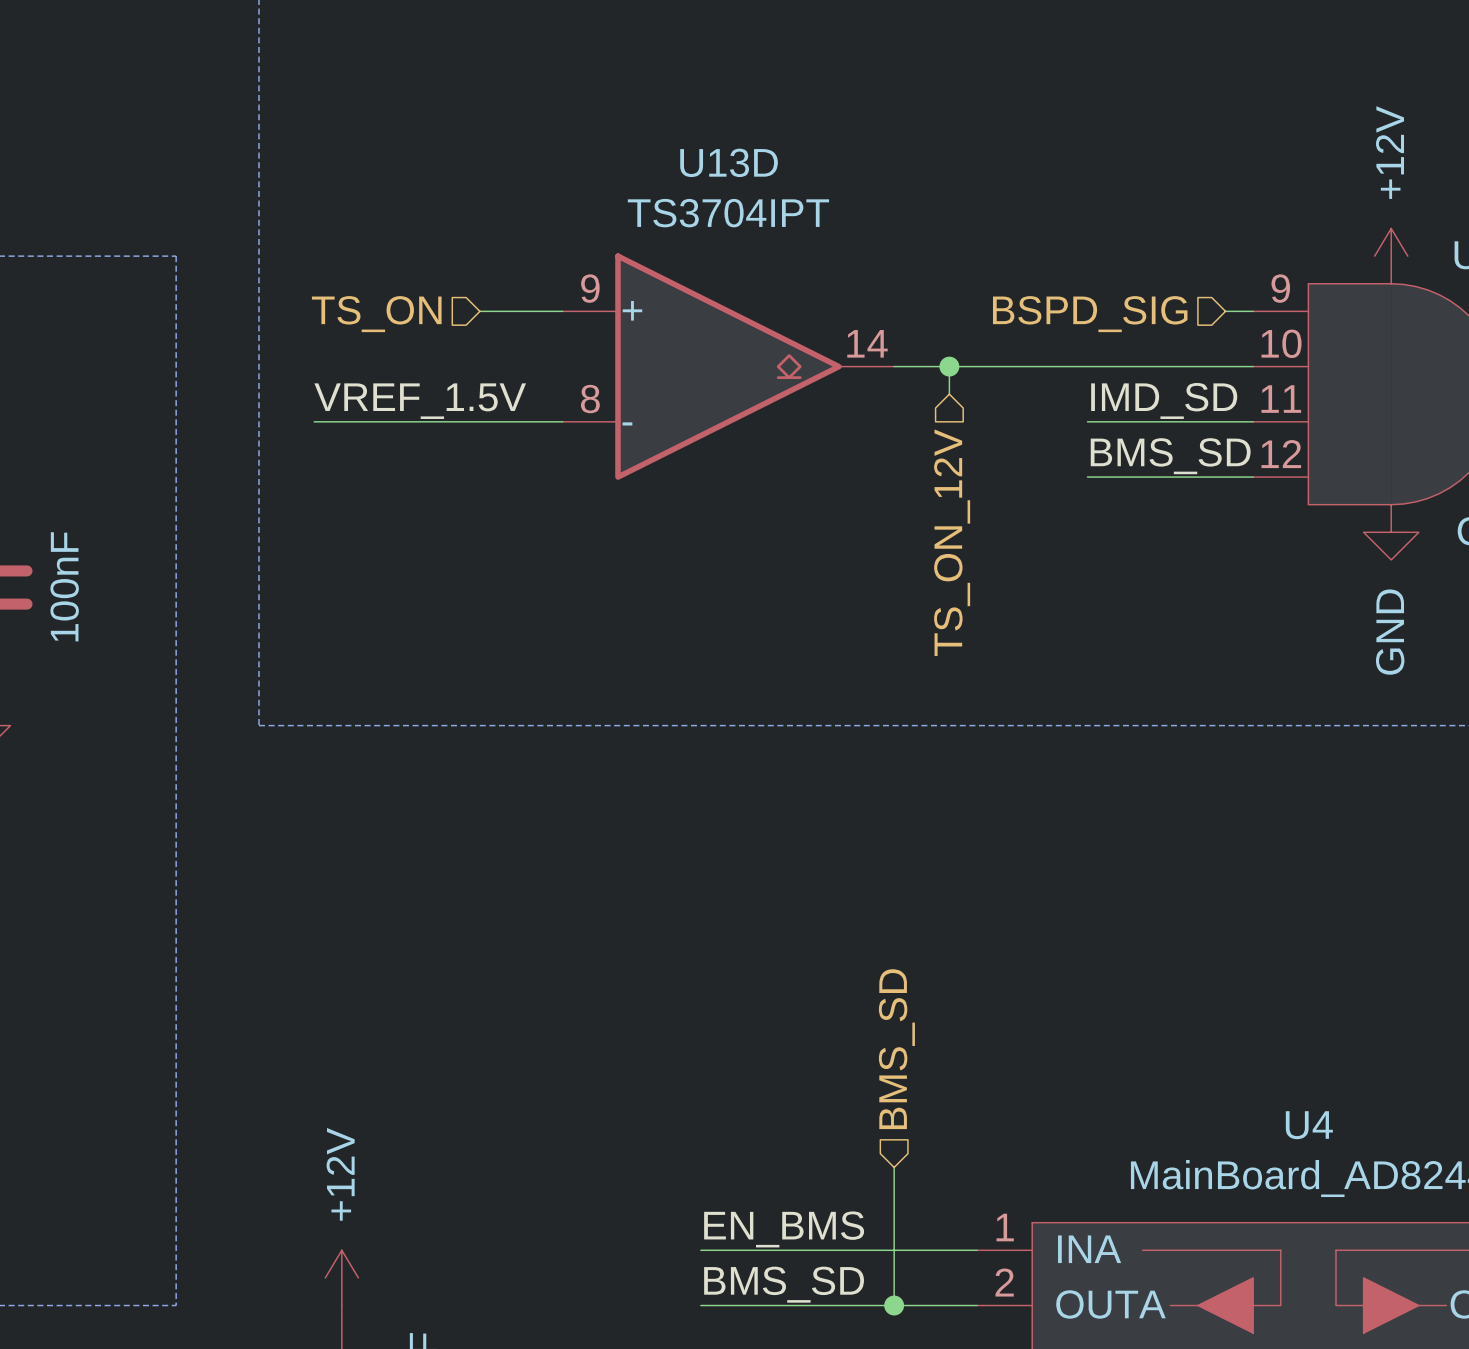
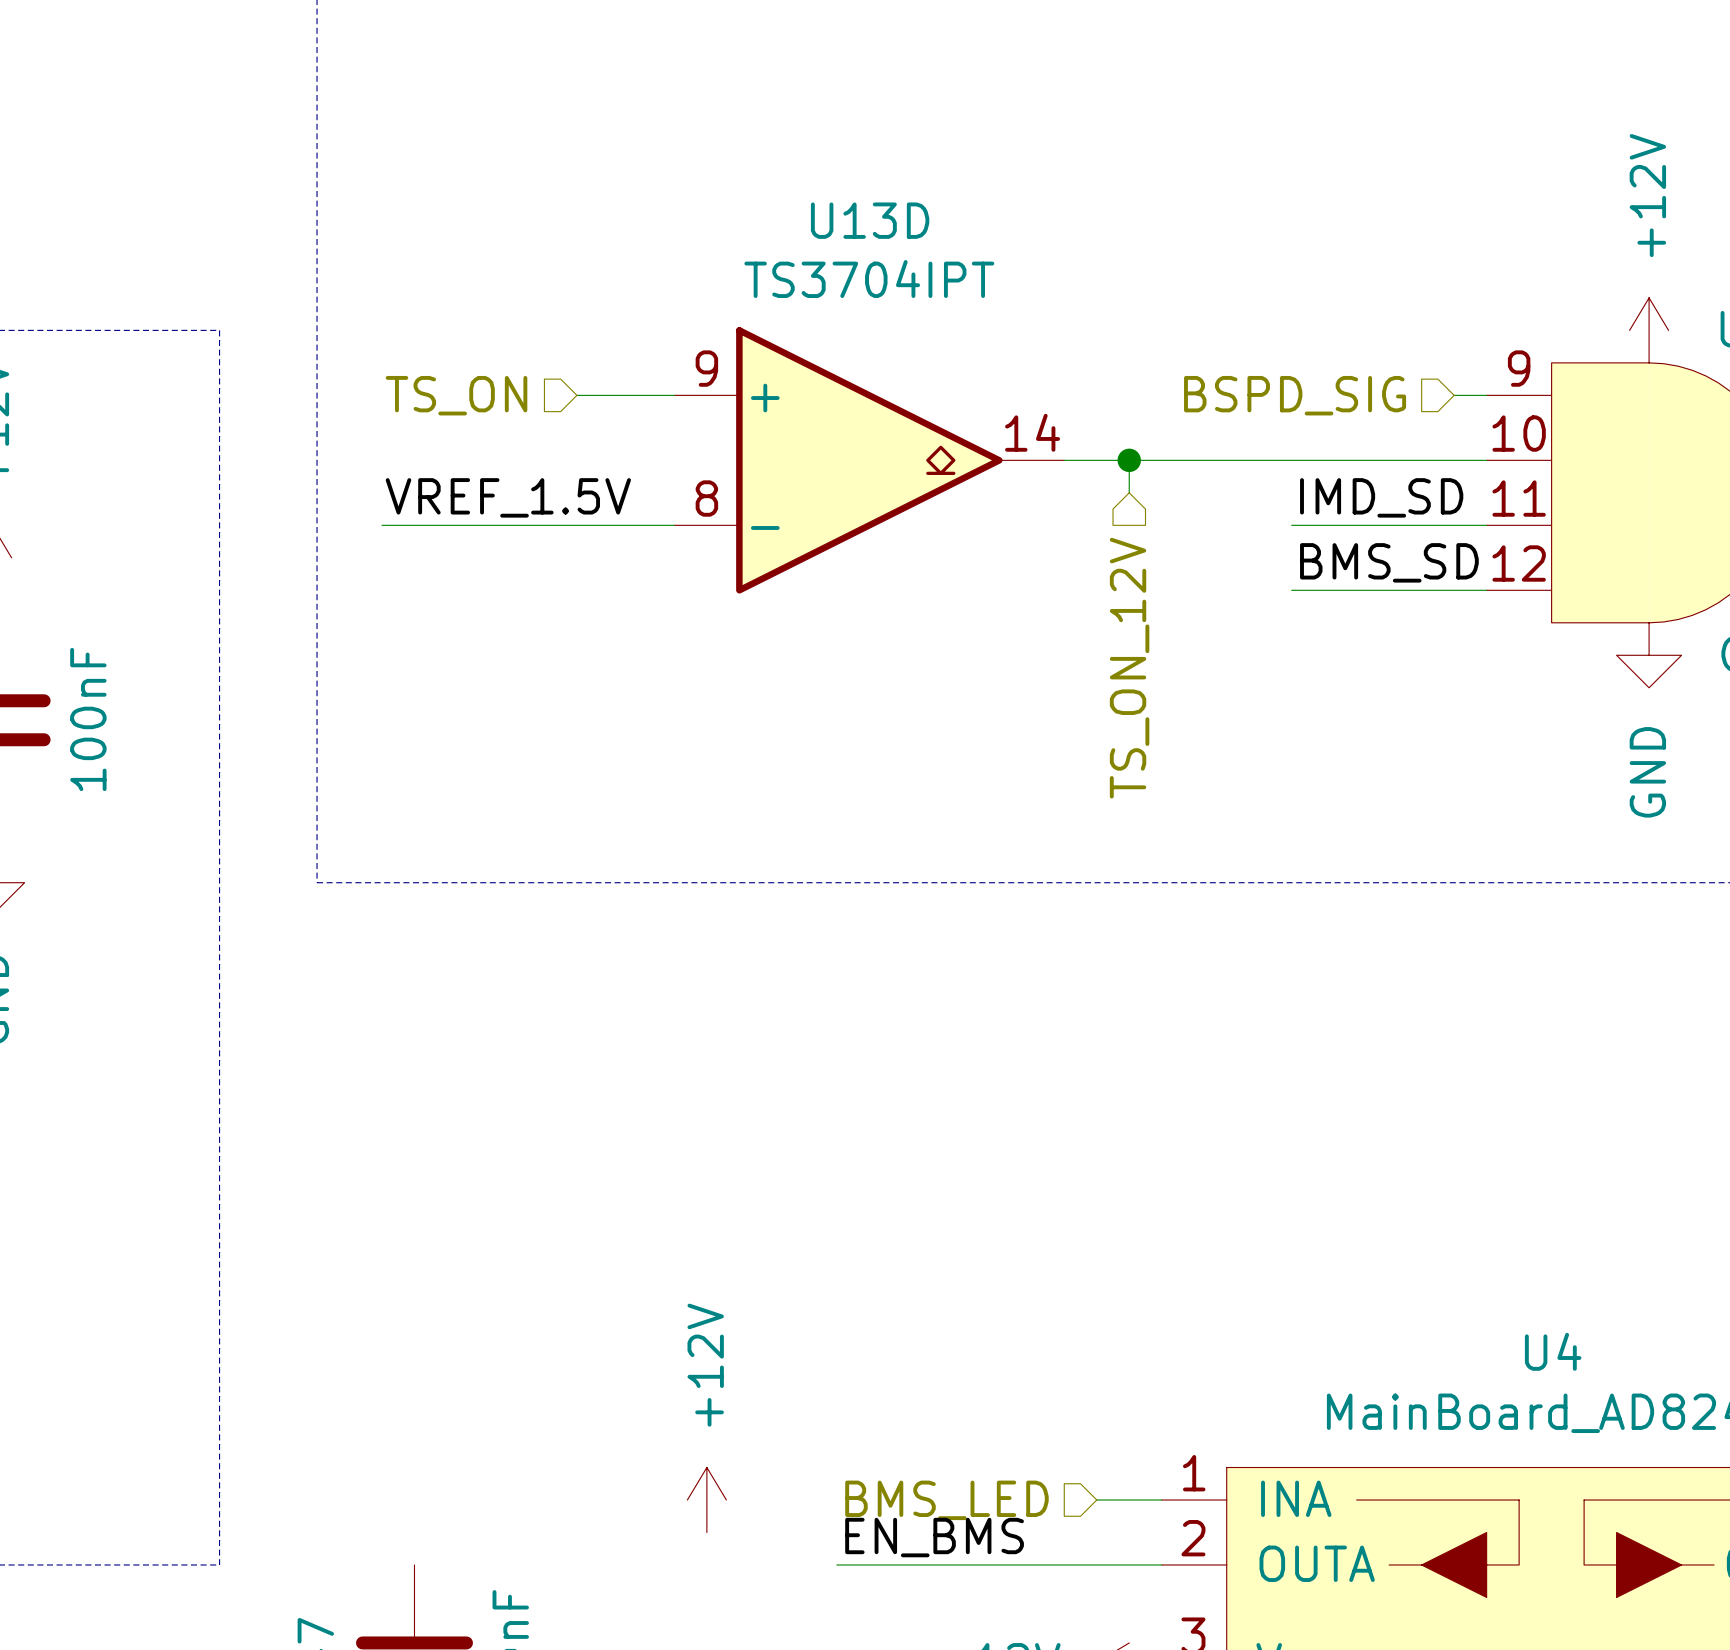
hierarchical label: BMS_SD (896, 1049) -> none
wire: (894, 1167) (894, 1305) -> none
label: EN_BMS (784, 1229) -> none
wire: (700, 1250) (921, 1250) -> none
hierarchical label: none -> BMS_LED (946, 1500)
power symbol position: +12V (341, 1277) -> +12V (706, 1500)
label: BMS_SD (784, 1284) -> EN_BMS (934, 1537)
junction: (894, 1305) -> none

